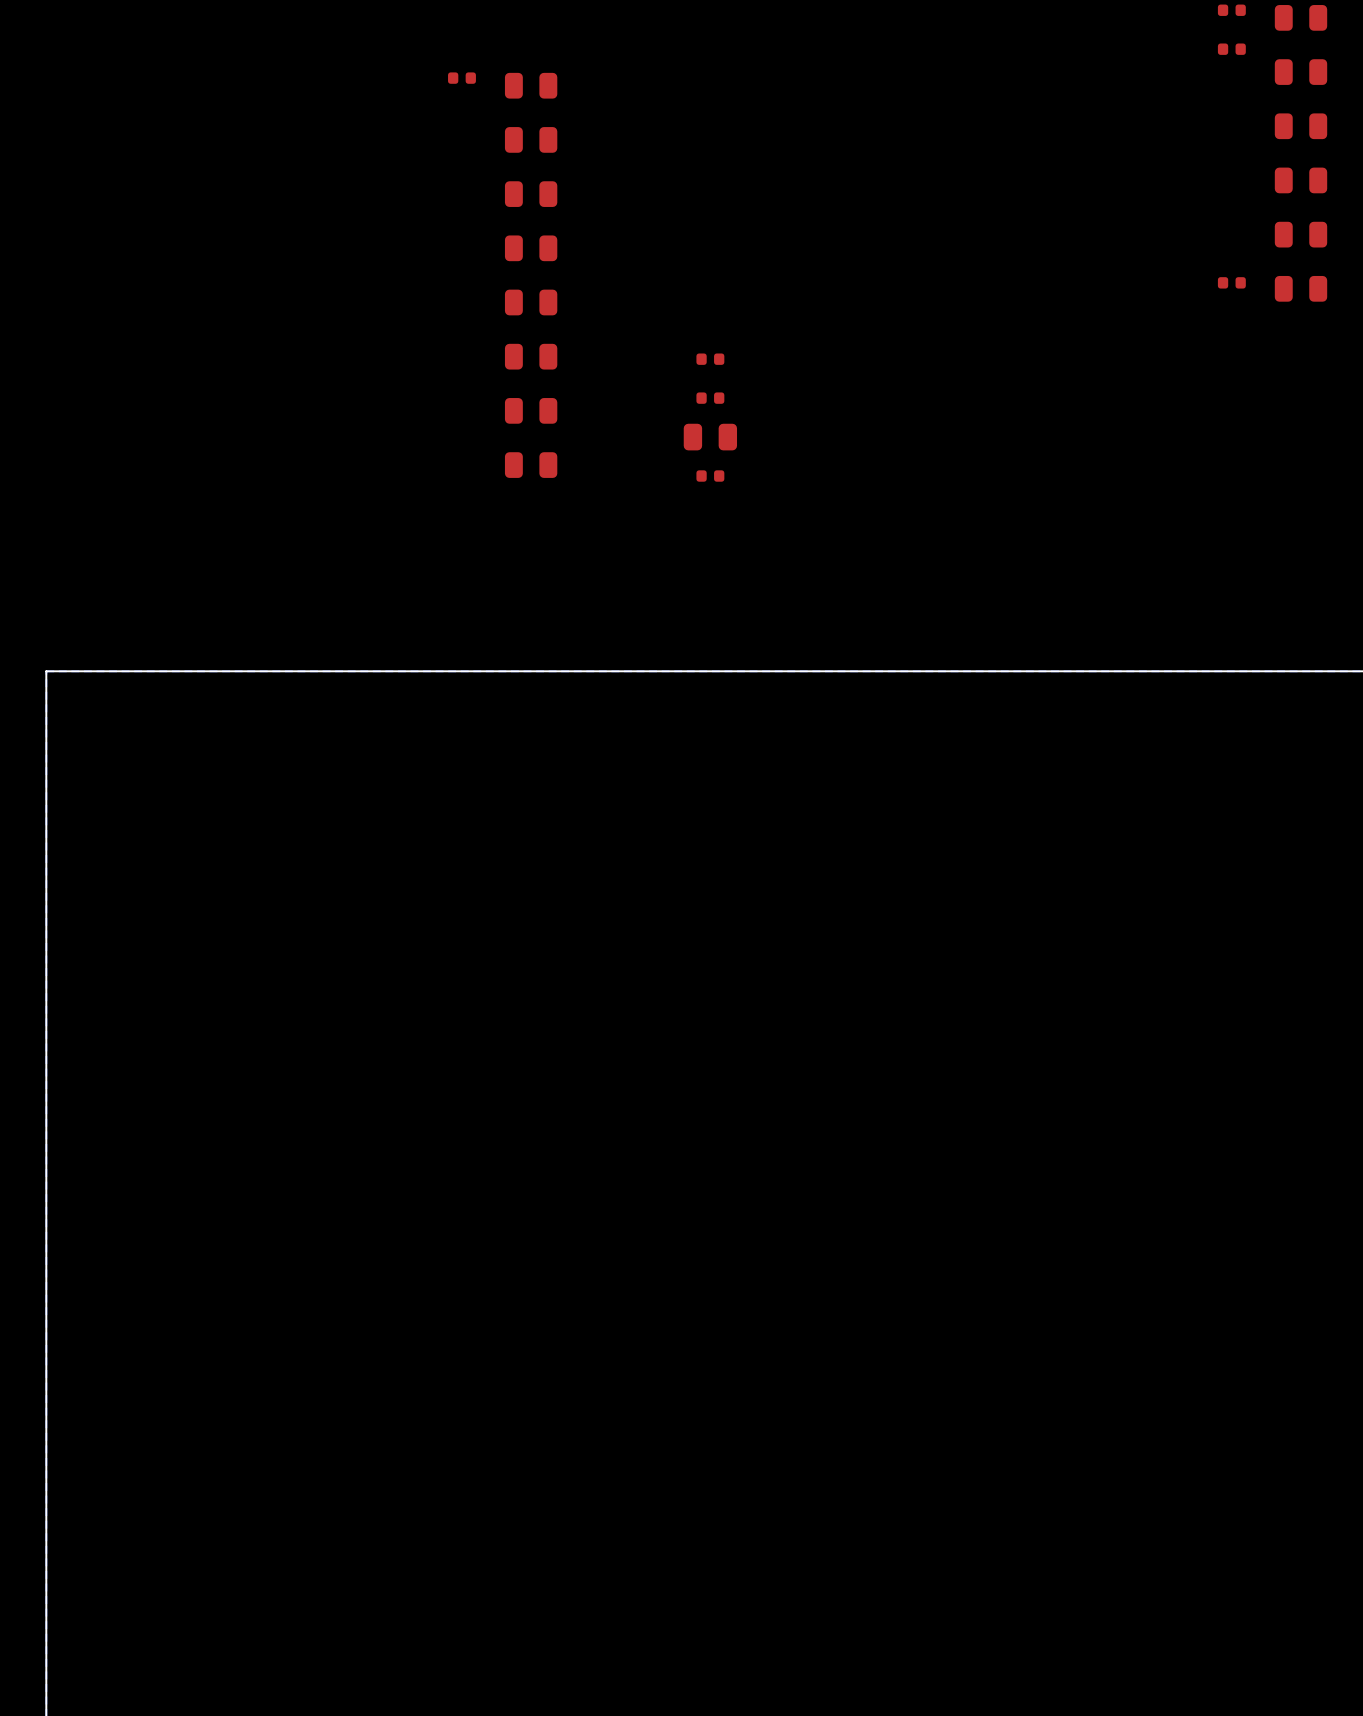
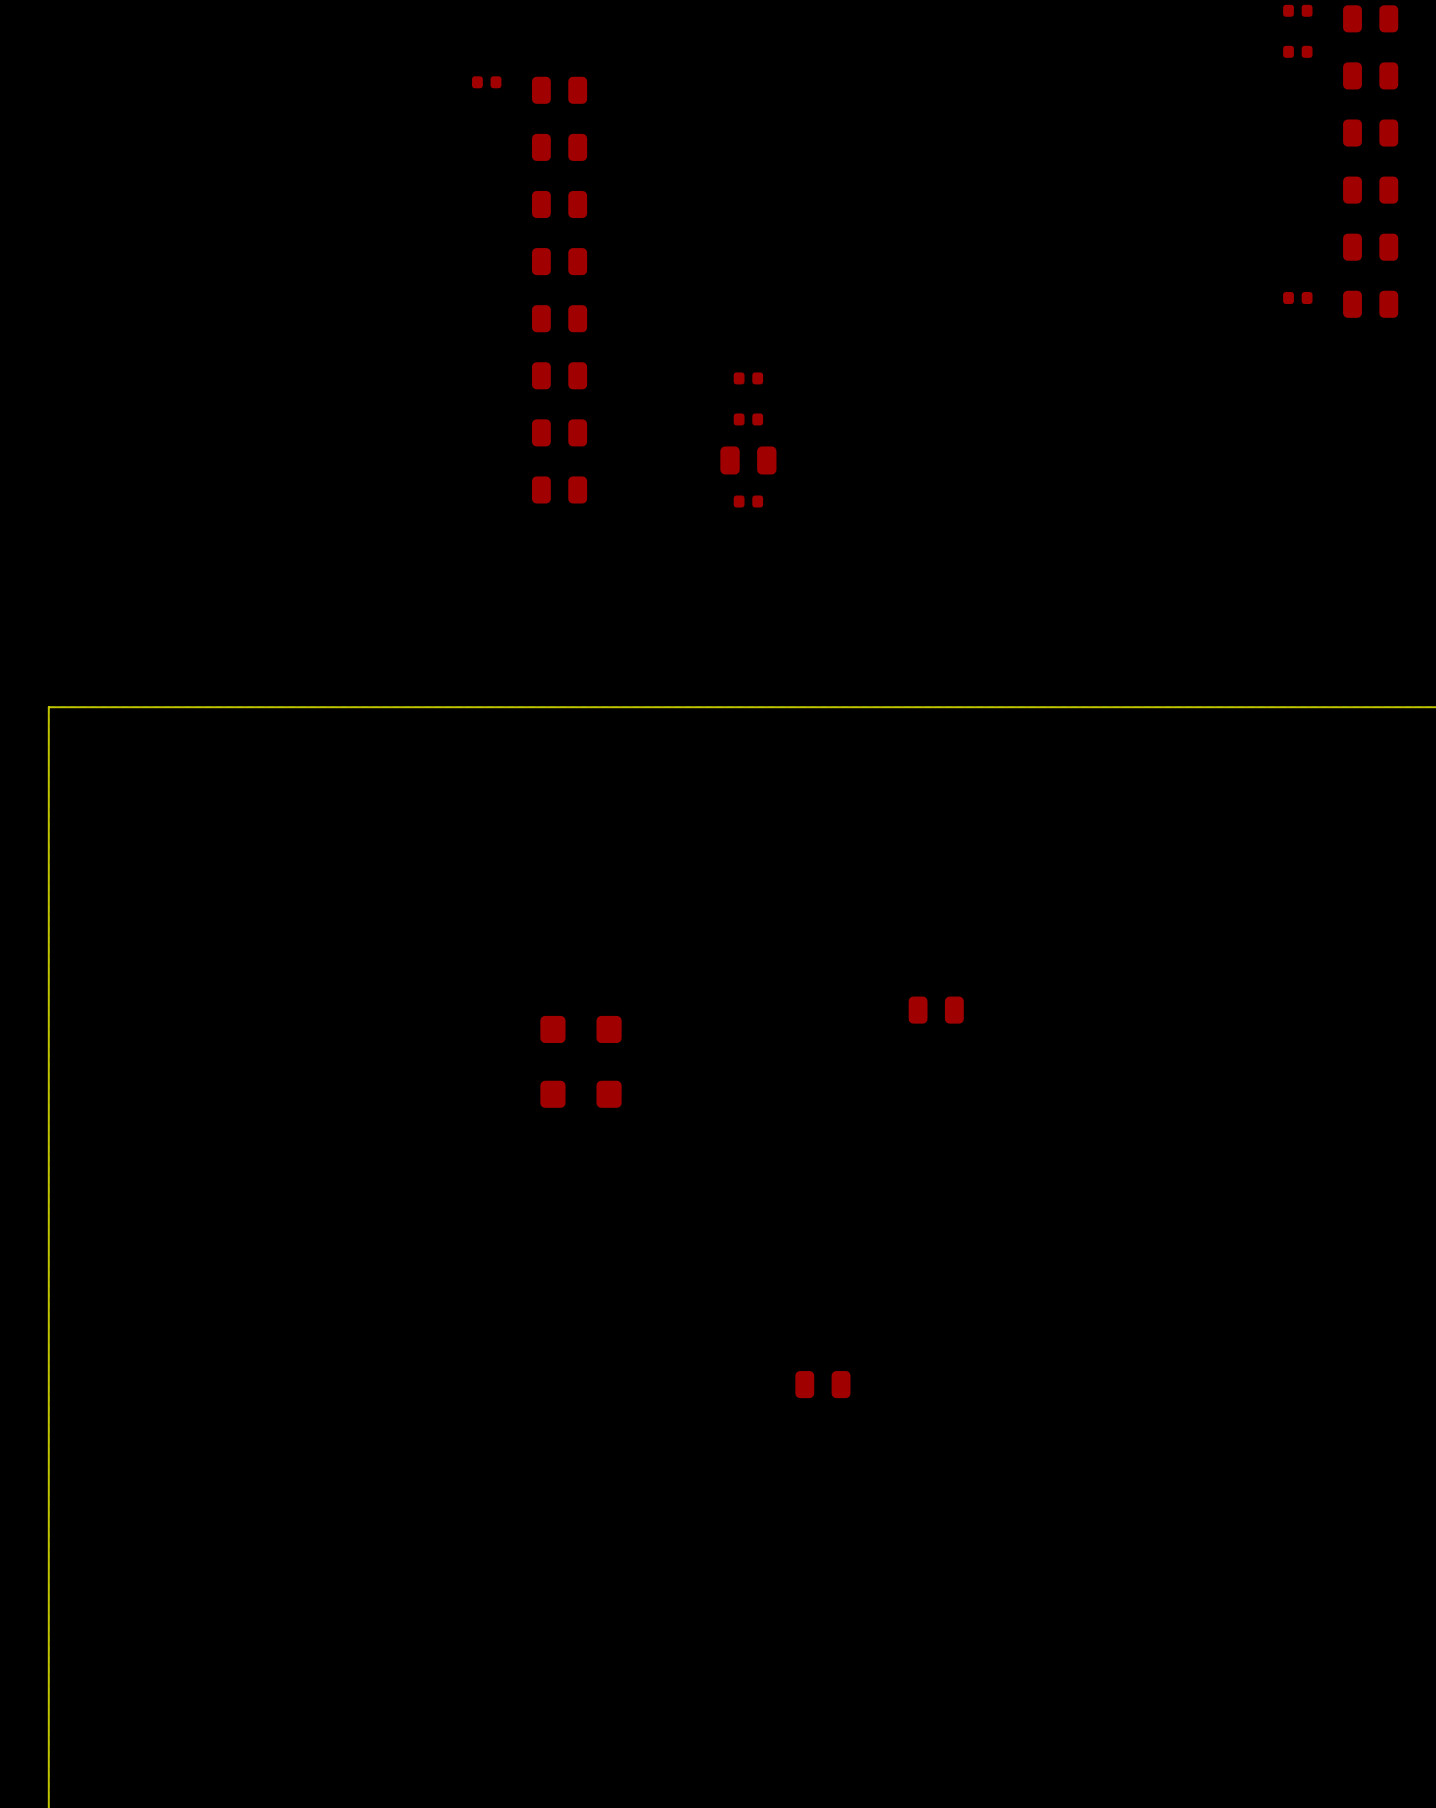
part: none -> (936, 1010)
part: none -> (581, 1029)
part: none -> (581, 1094)
part: none -> (822, 1384)

